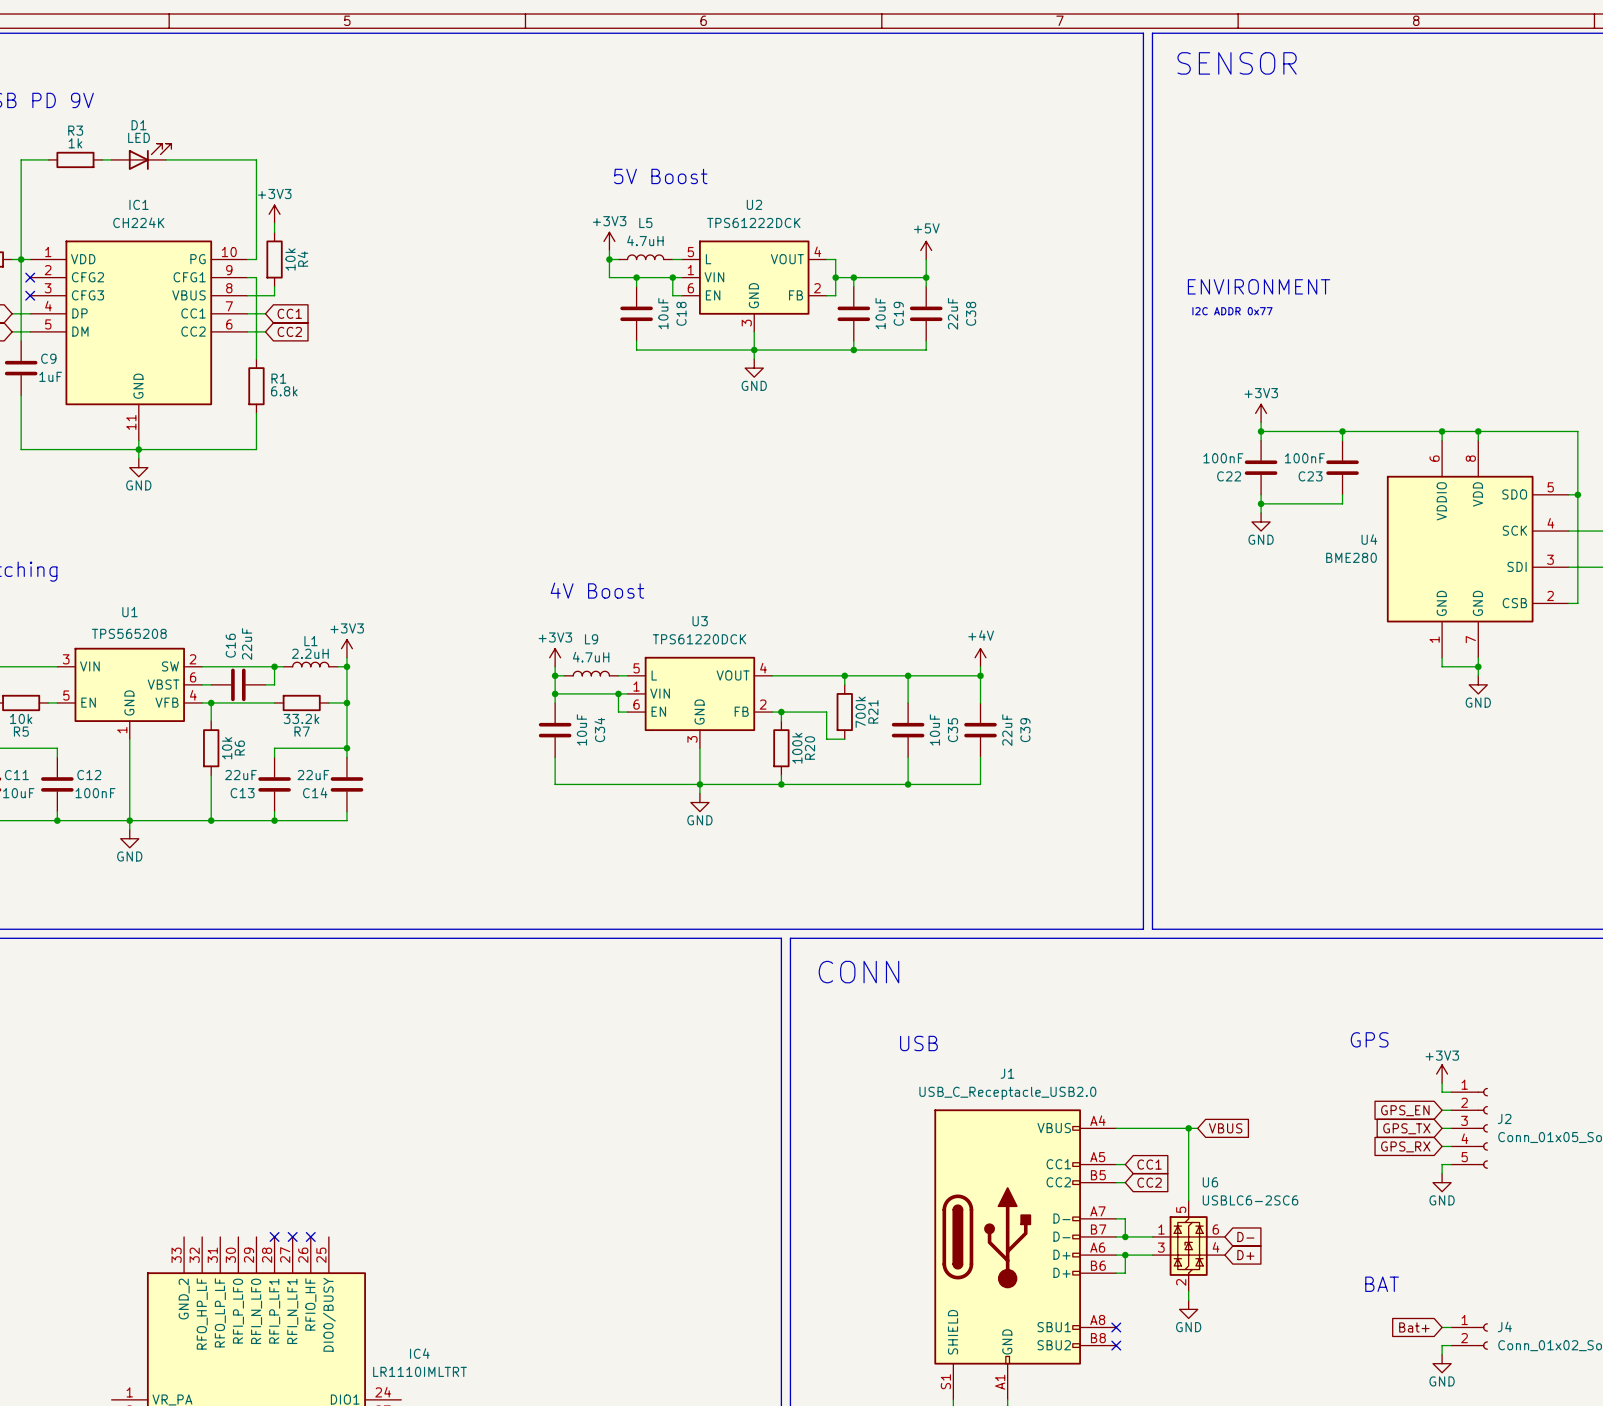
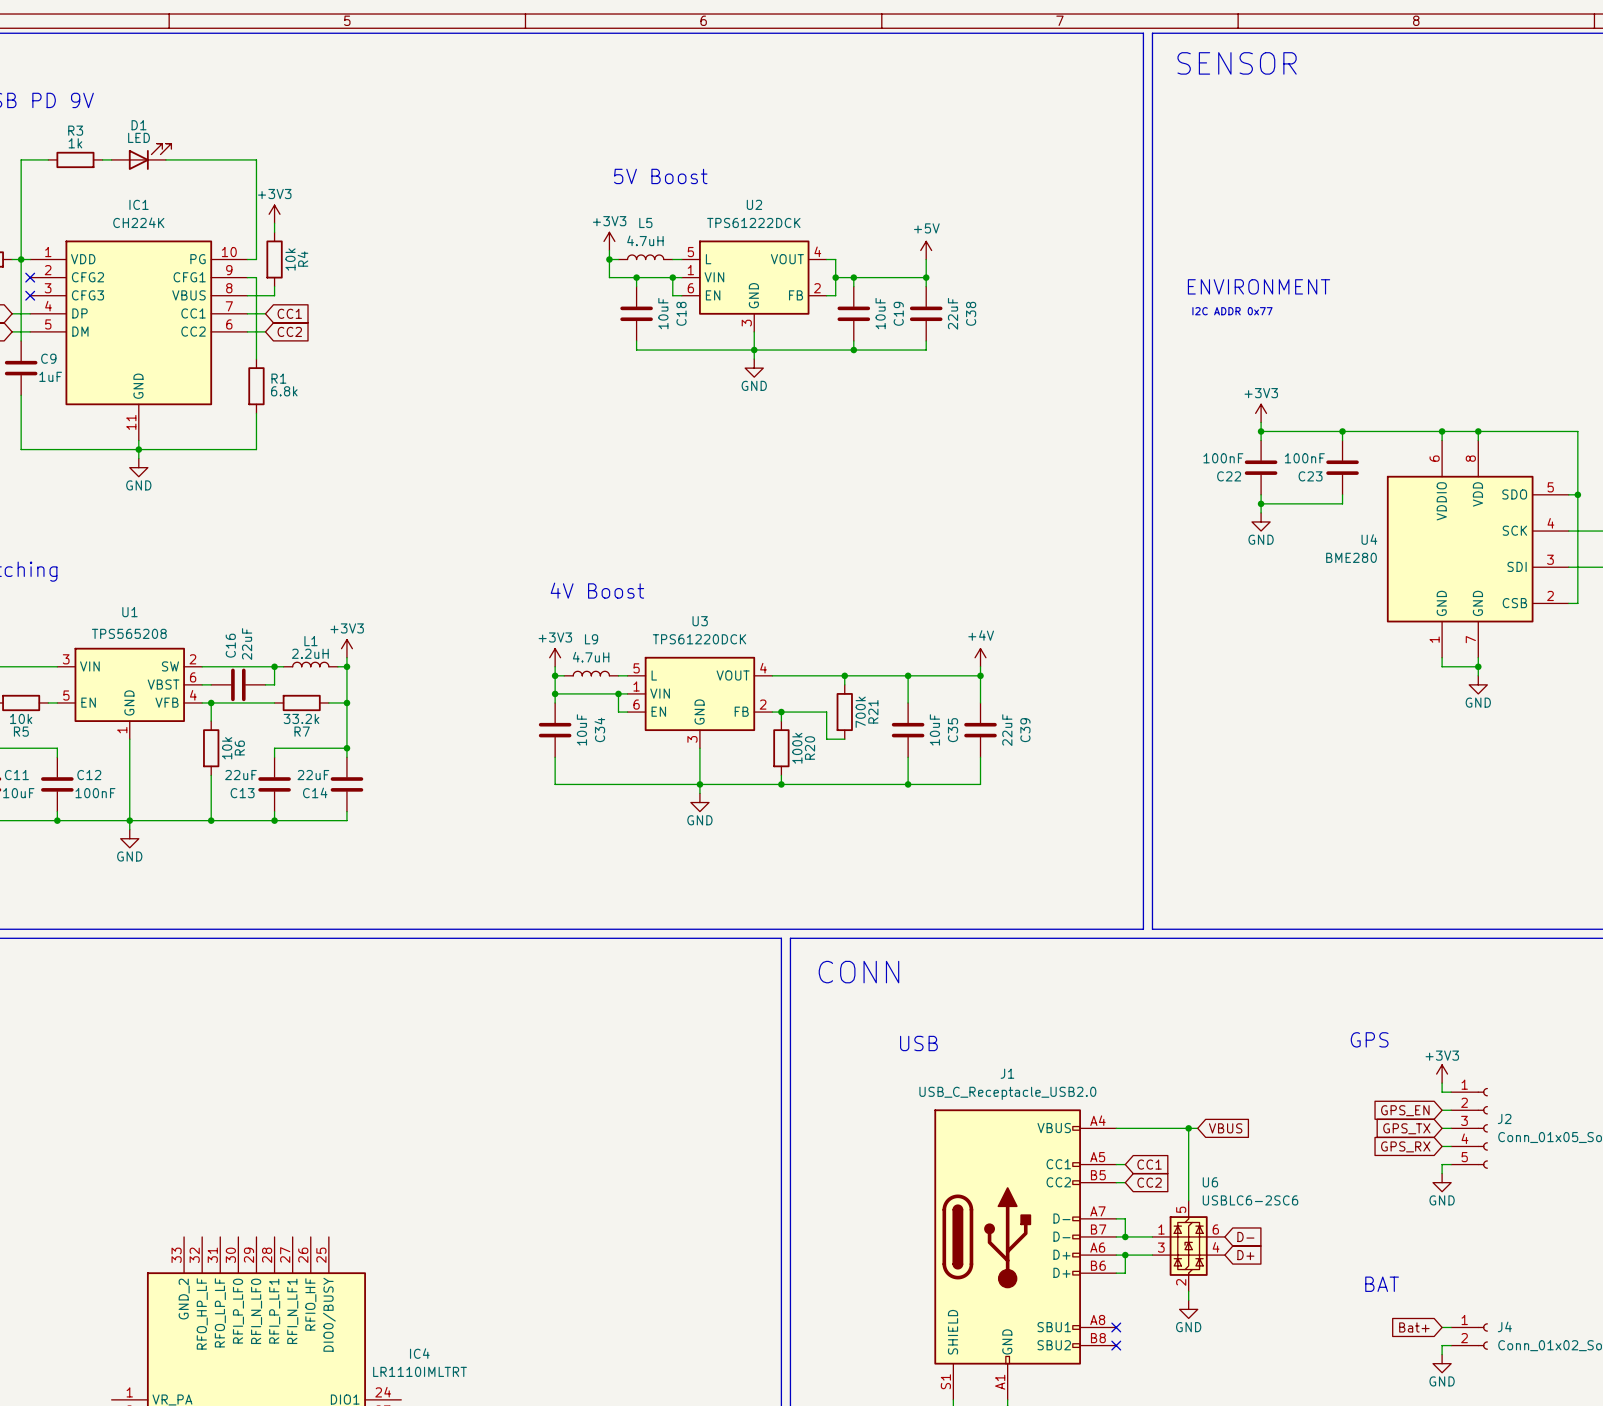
no-connect mark: (274, 1236) -> none
no-connect mark: (292, 1236) -> none
no-connect mark: (310, 1236) -> none

